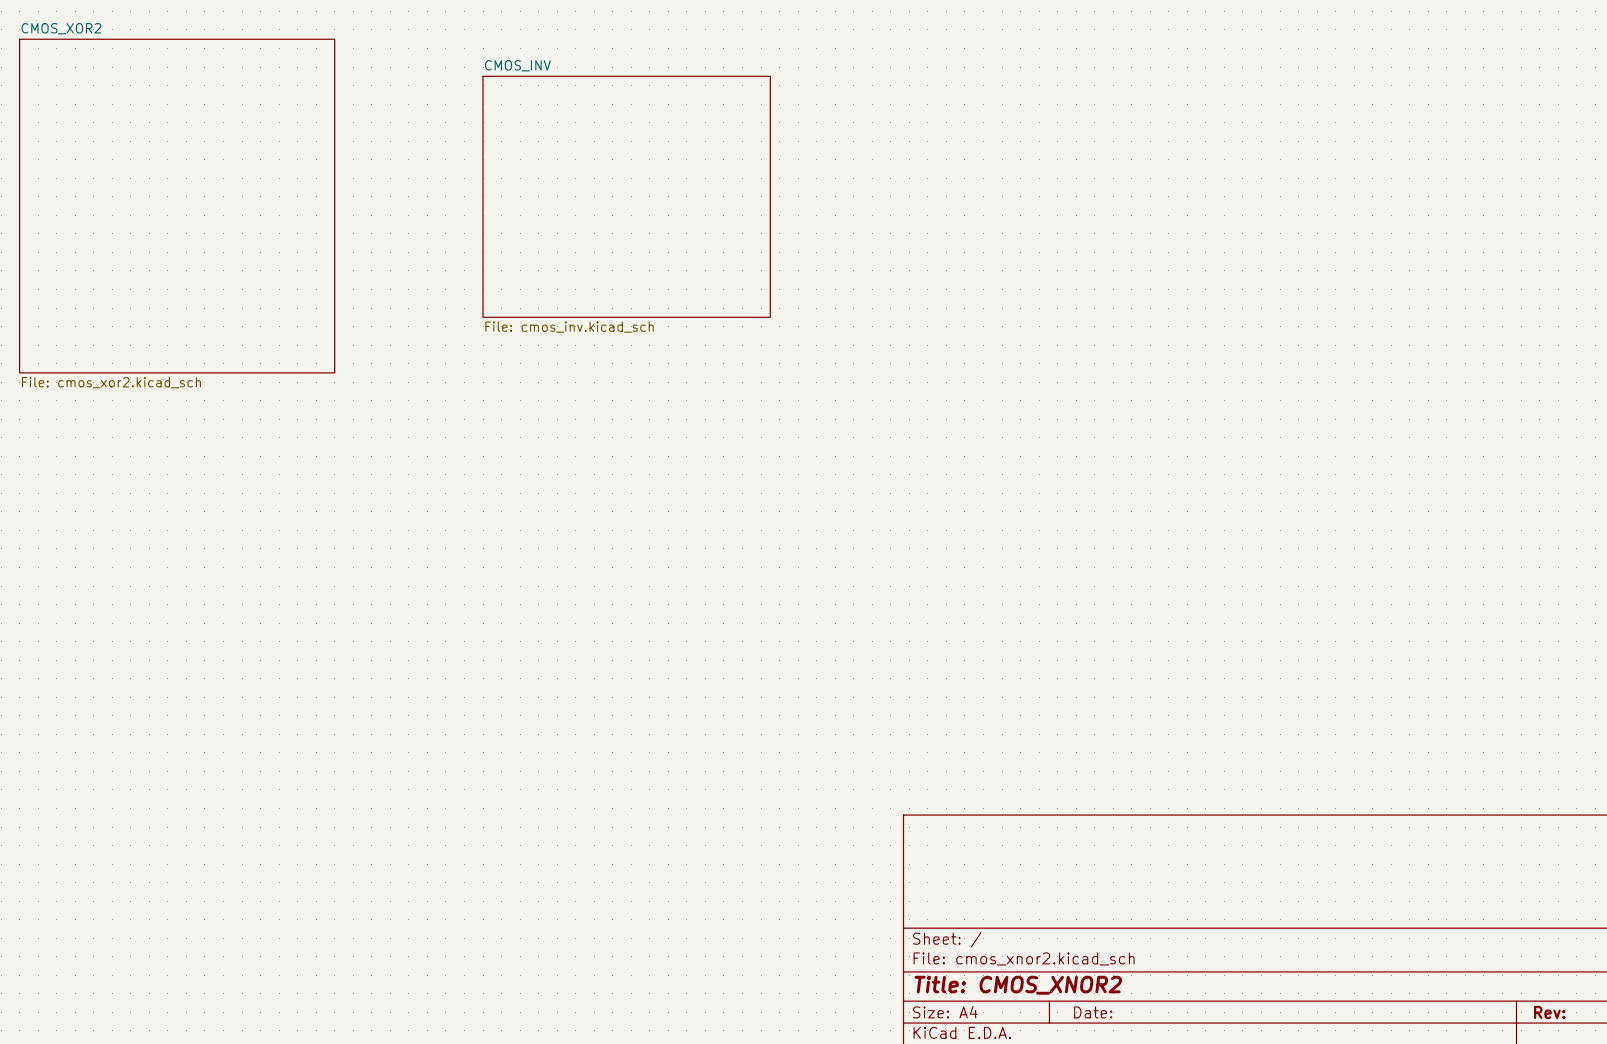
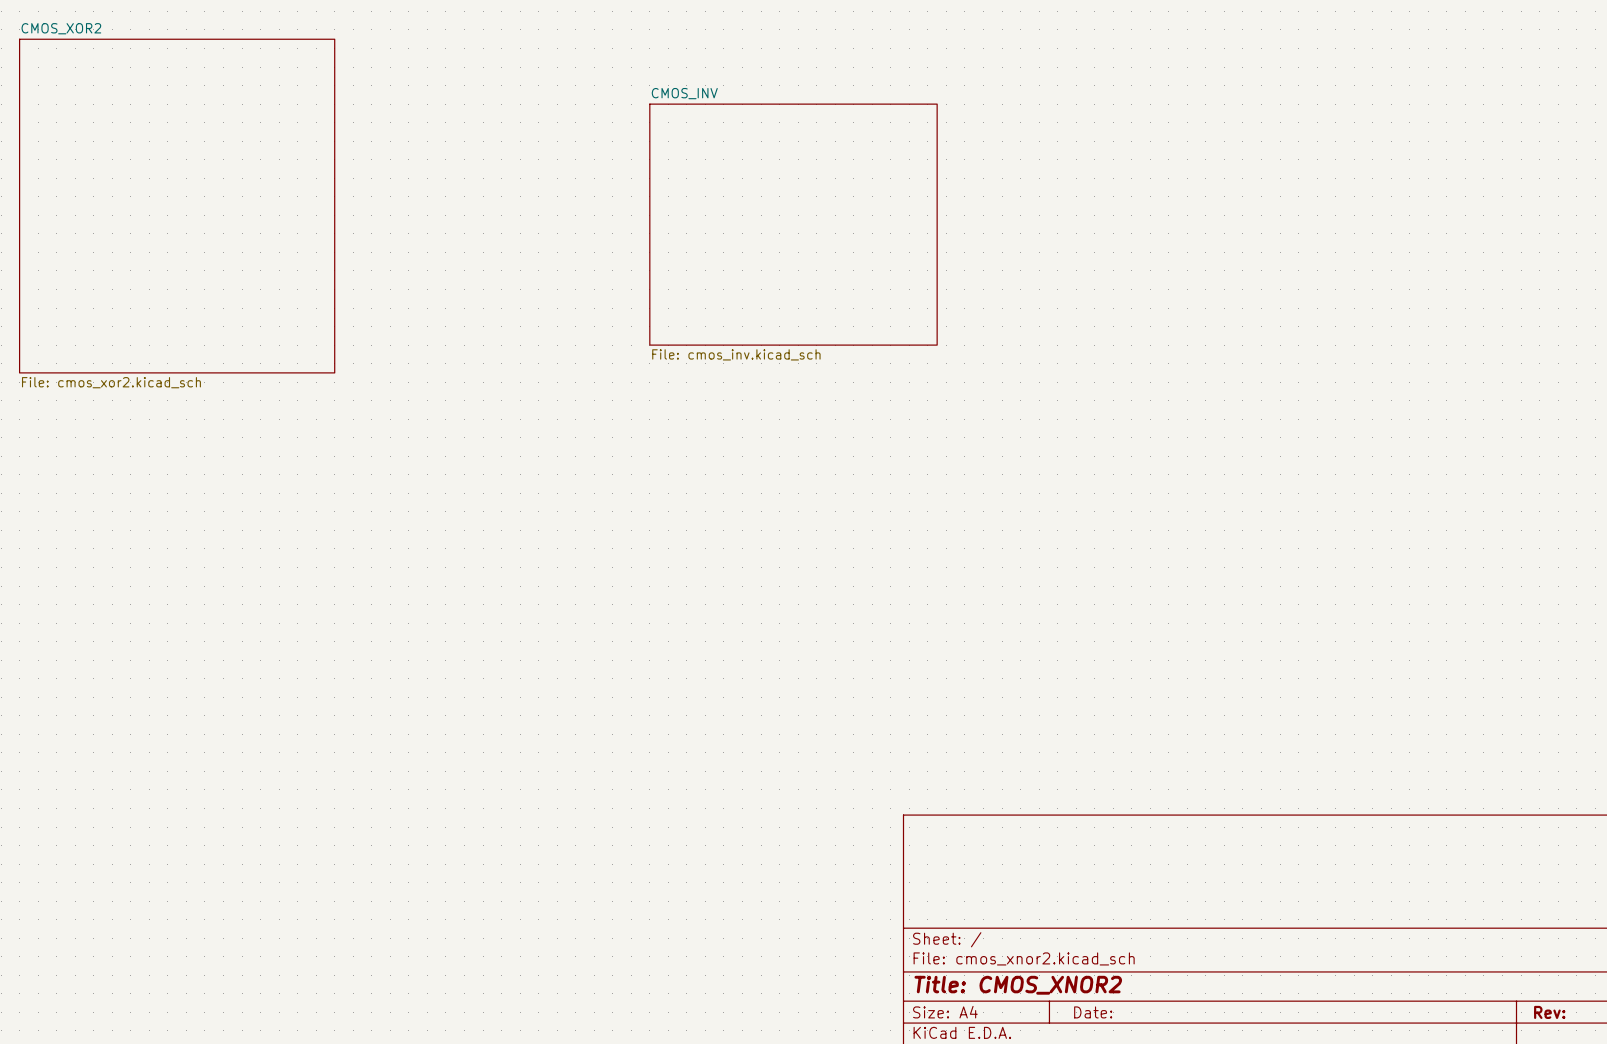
sheet CMOS_INV position: (626, 196) -> (793, 224)

